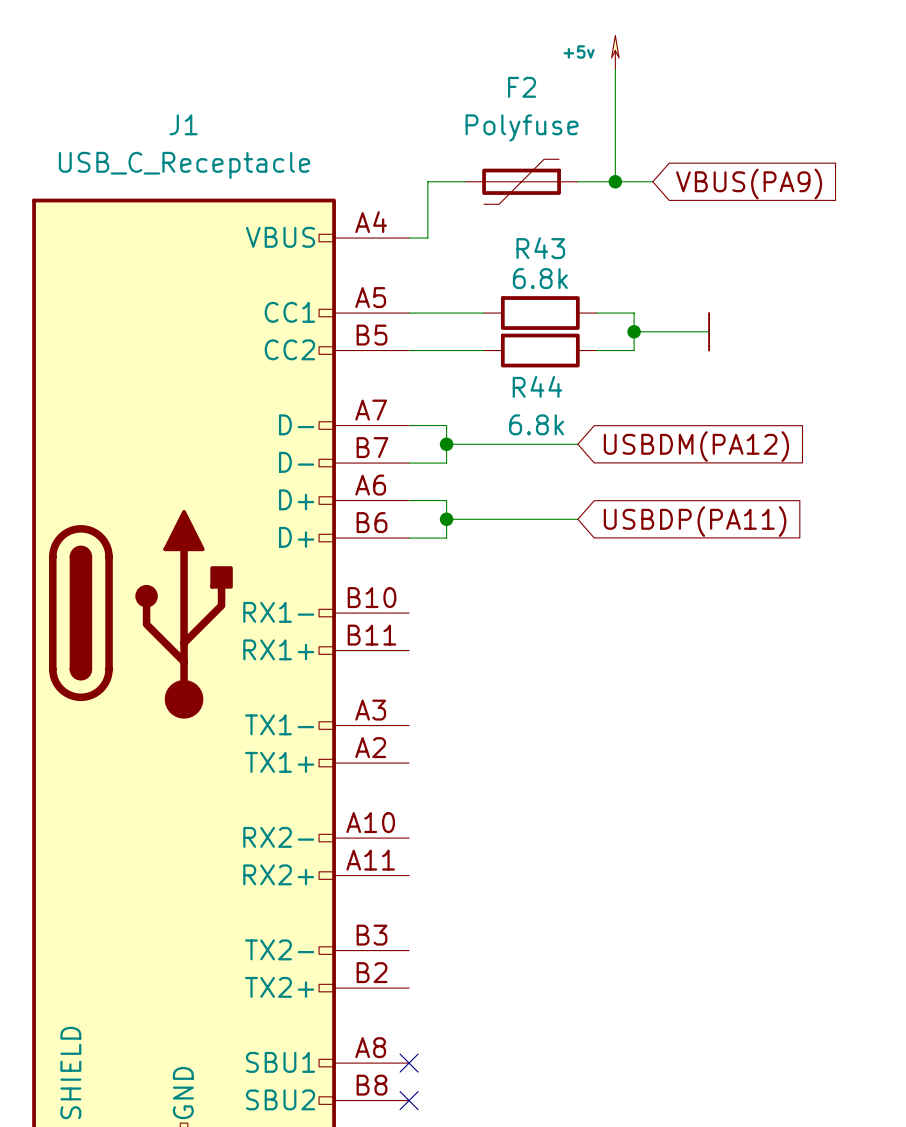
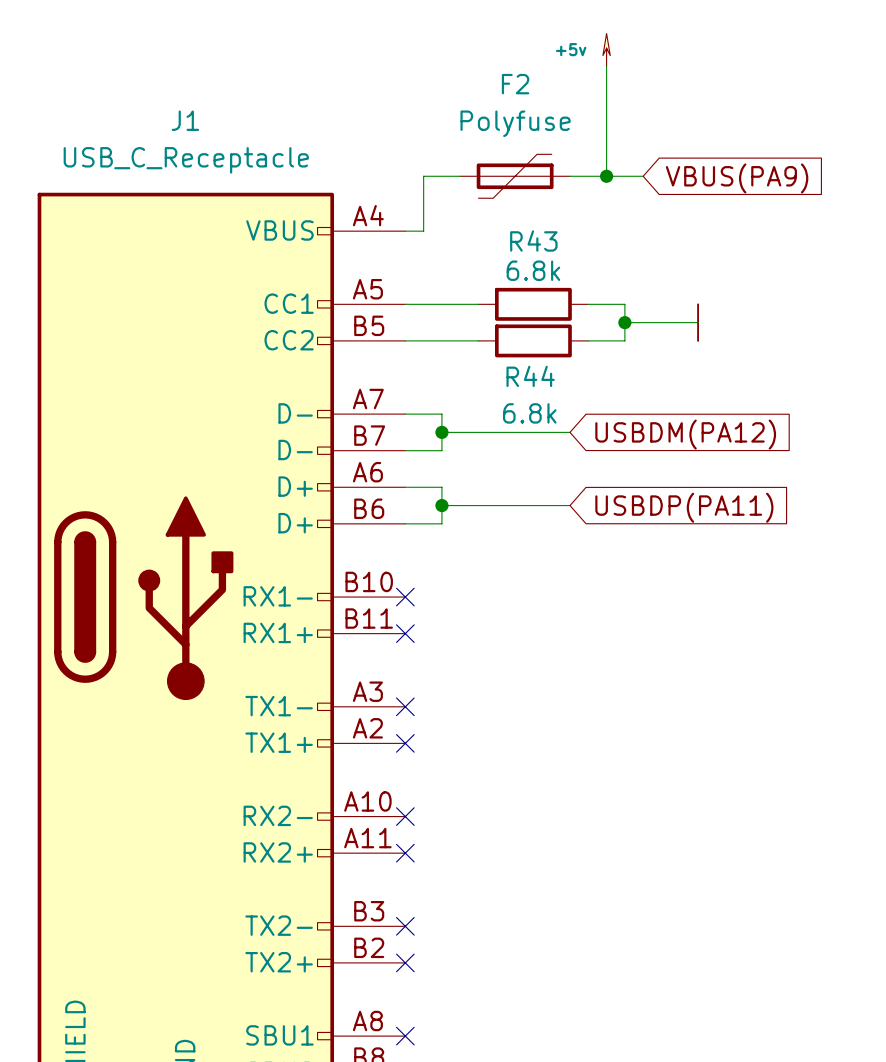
no-connect mark: none -> (405, 597)
no-connect mark: none -> (405, 633)
no-connect mark: none -> (405, 706)
no-connect mark: none -> (405, 743)
no-connect mark: none -> (405, 816)
no-connect mark: none -> (405, 853)
no-connect mark: none -> (405, 926)
no-connect mark: none -> (405, 962)

